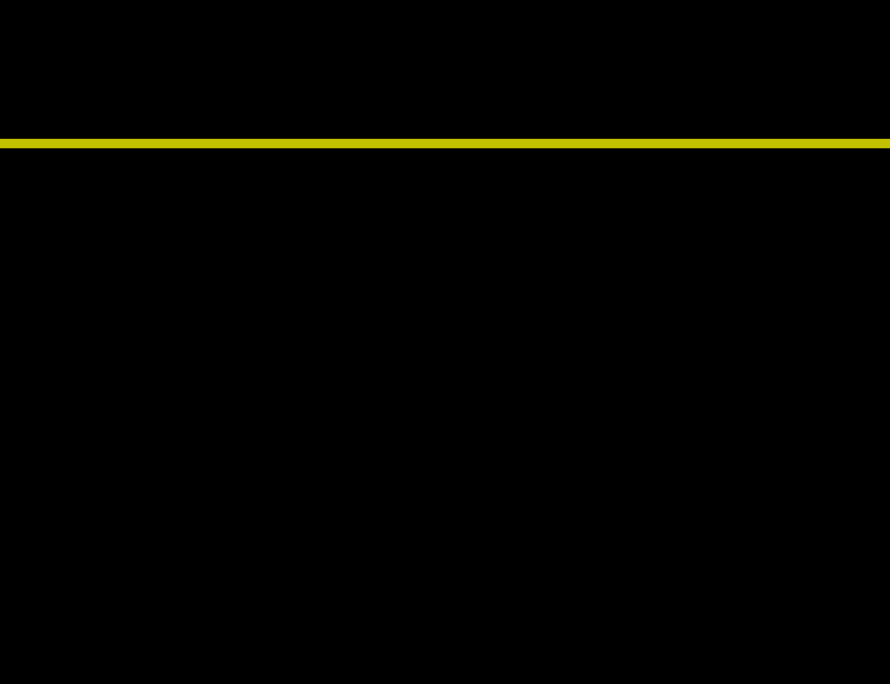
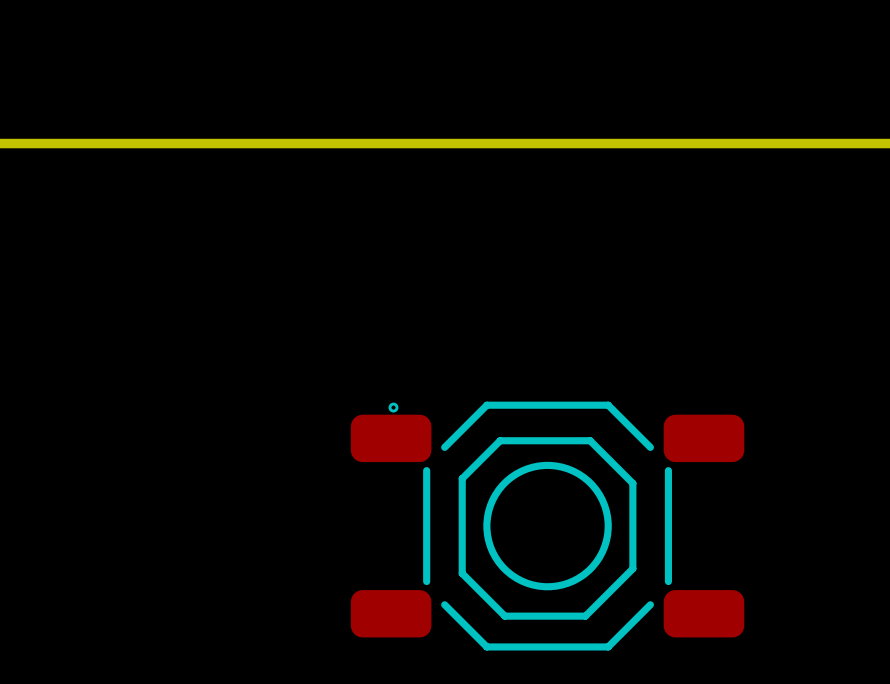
part: none -> (547, 526)

